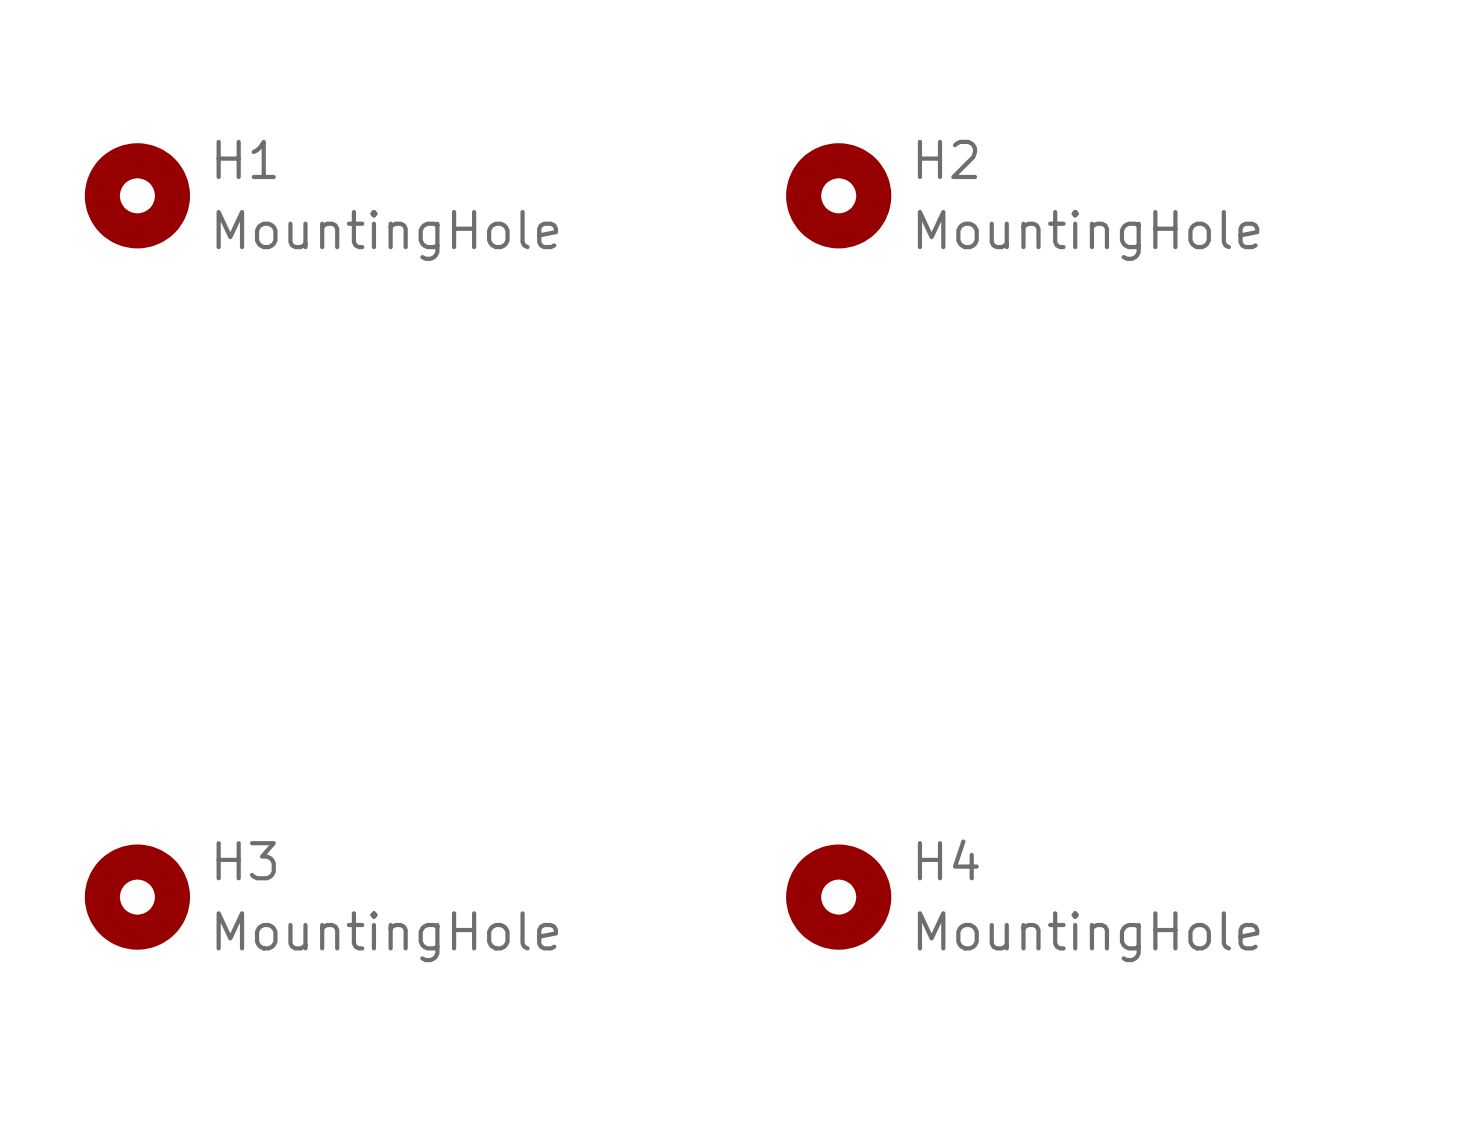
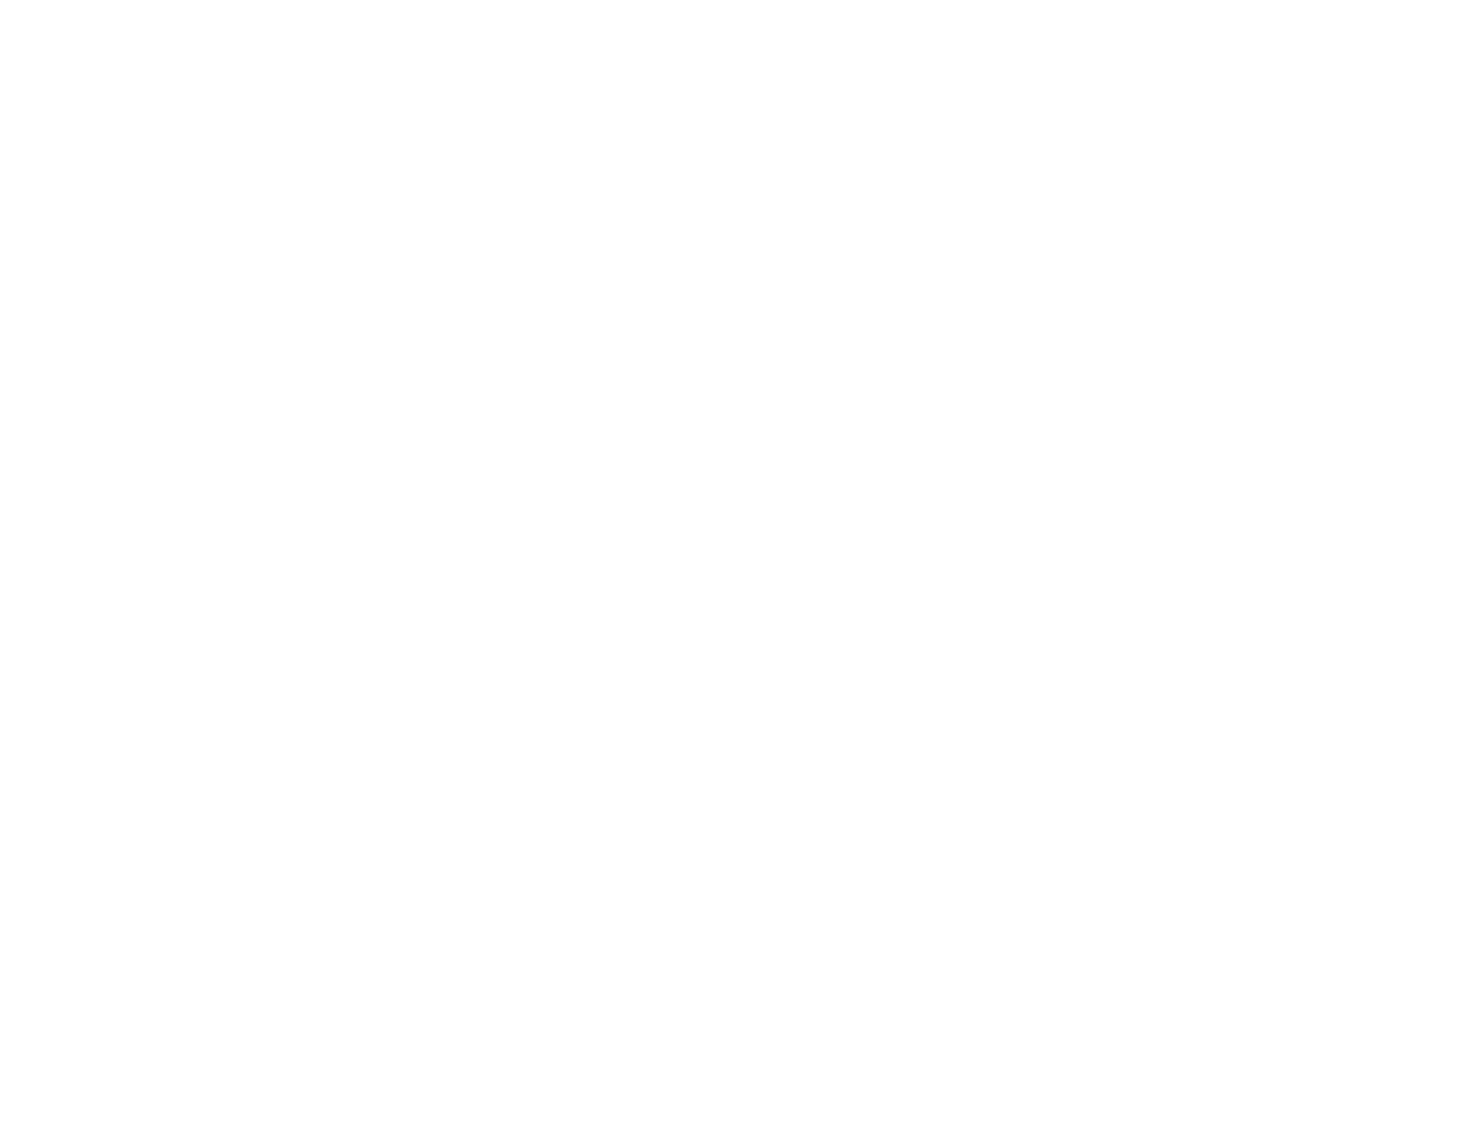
H1: MountingHole (137, 195) -> none
H2: MountingHole (838, 195) -> none
H3: MountingHole (137, 897) -> none
H4: MountingHole (838, 897) -> none

